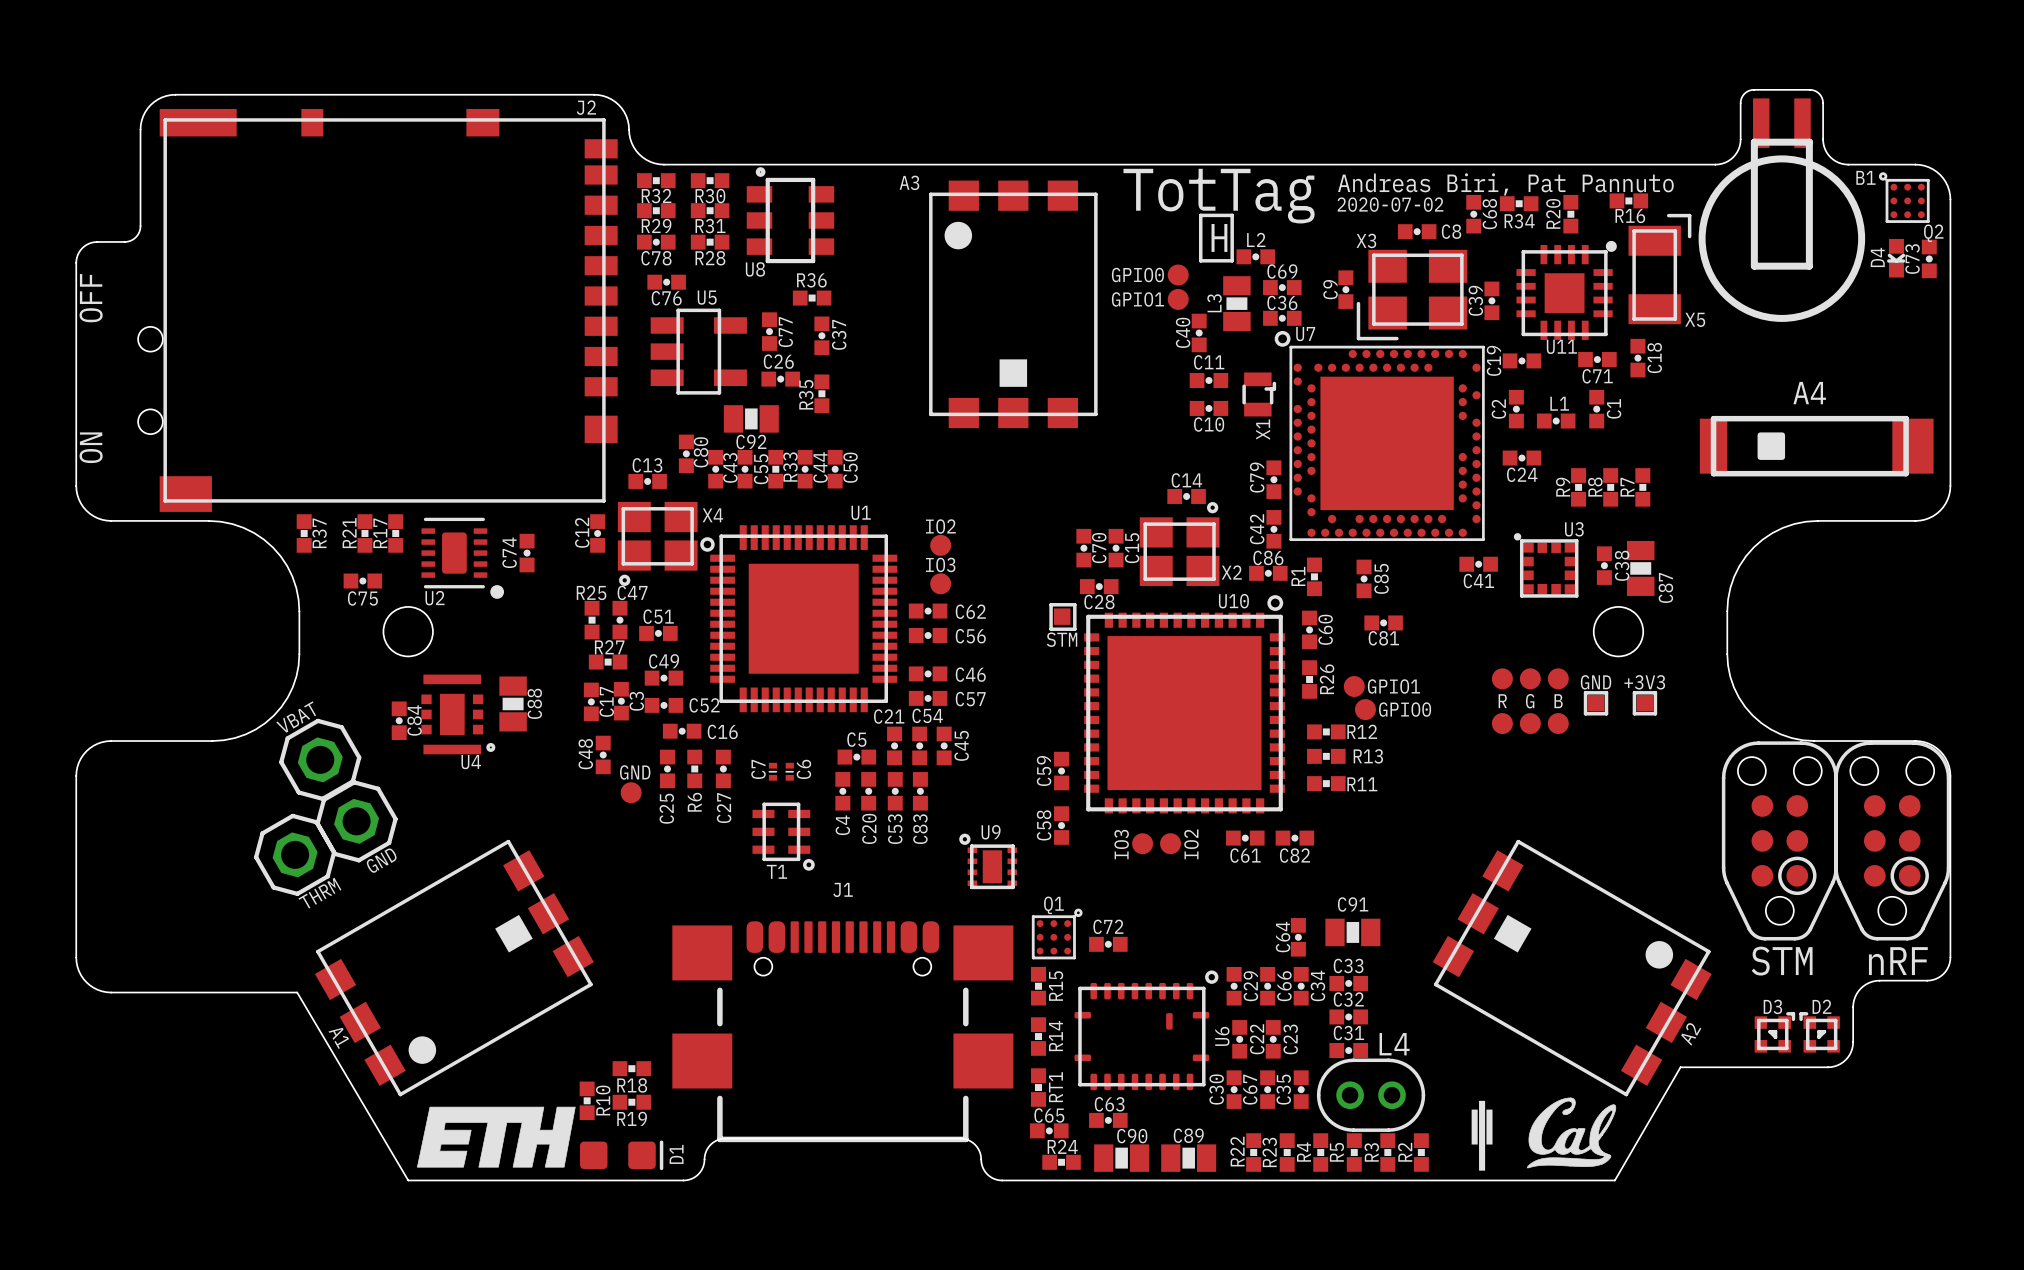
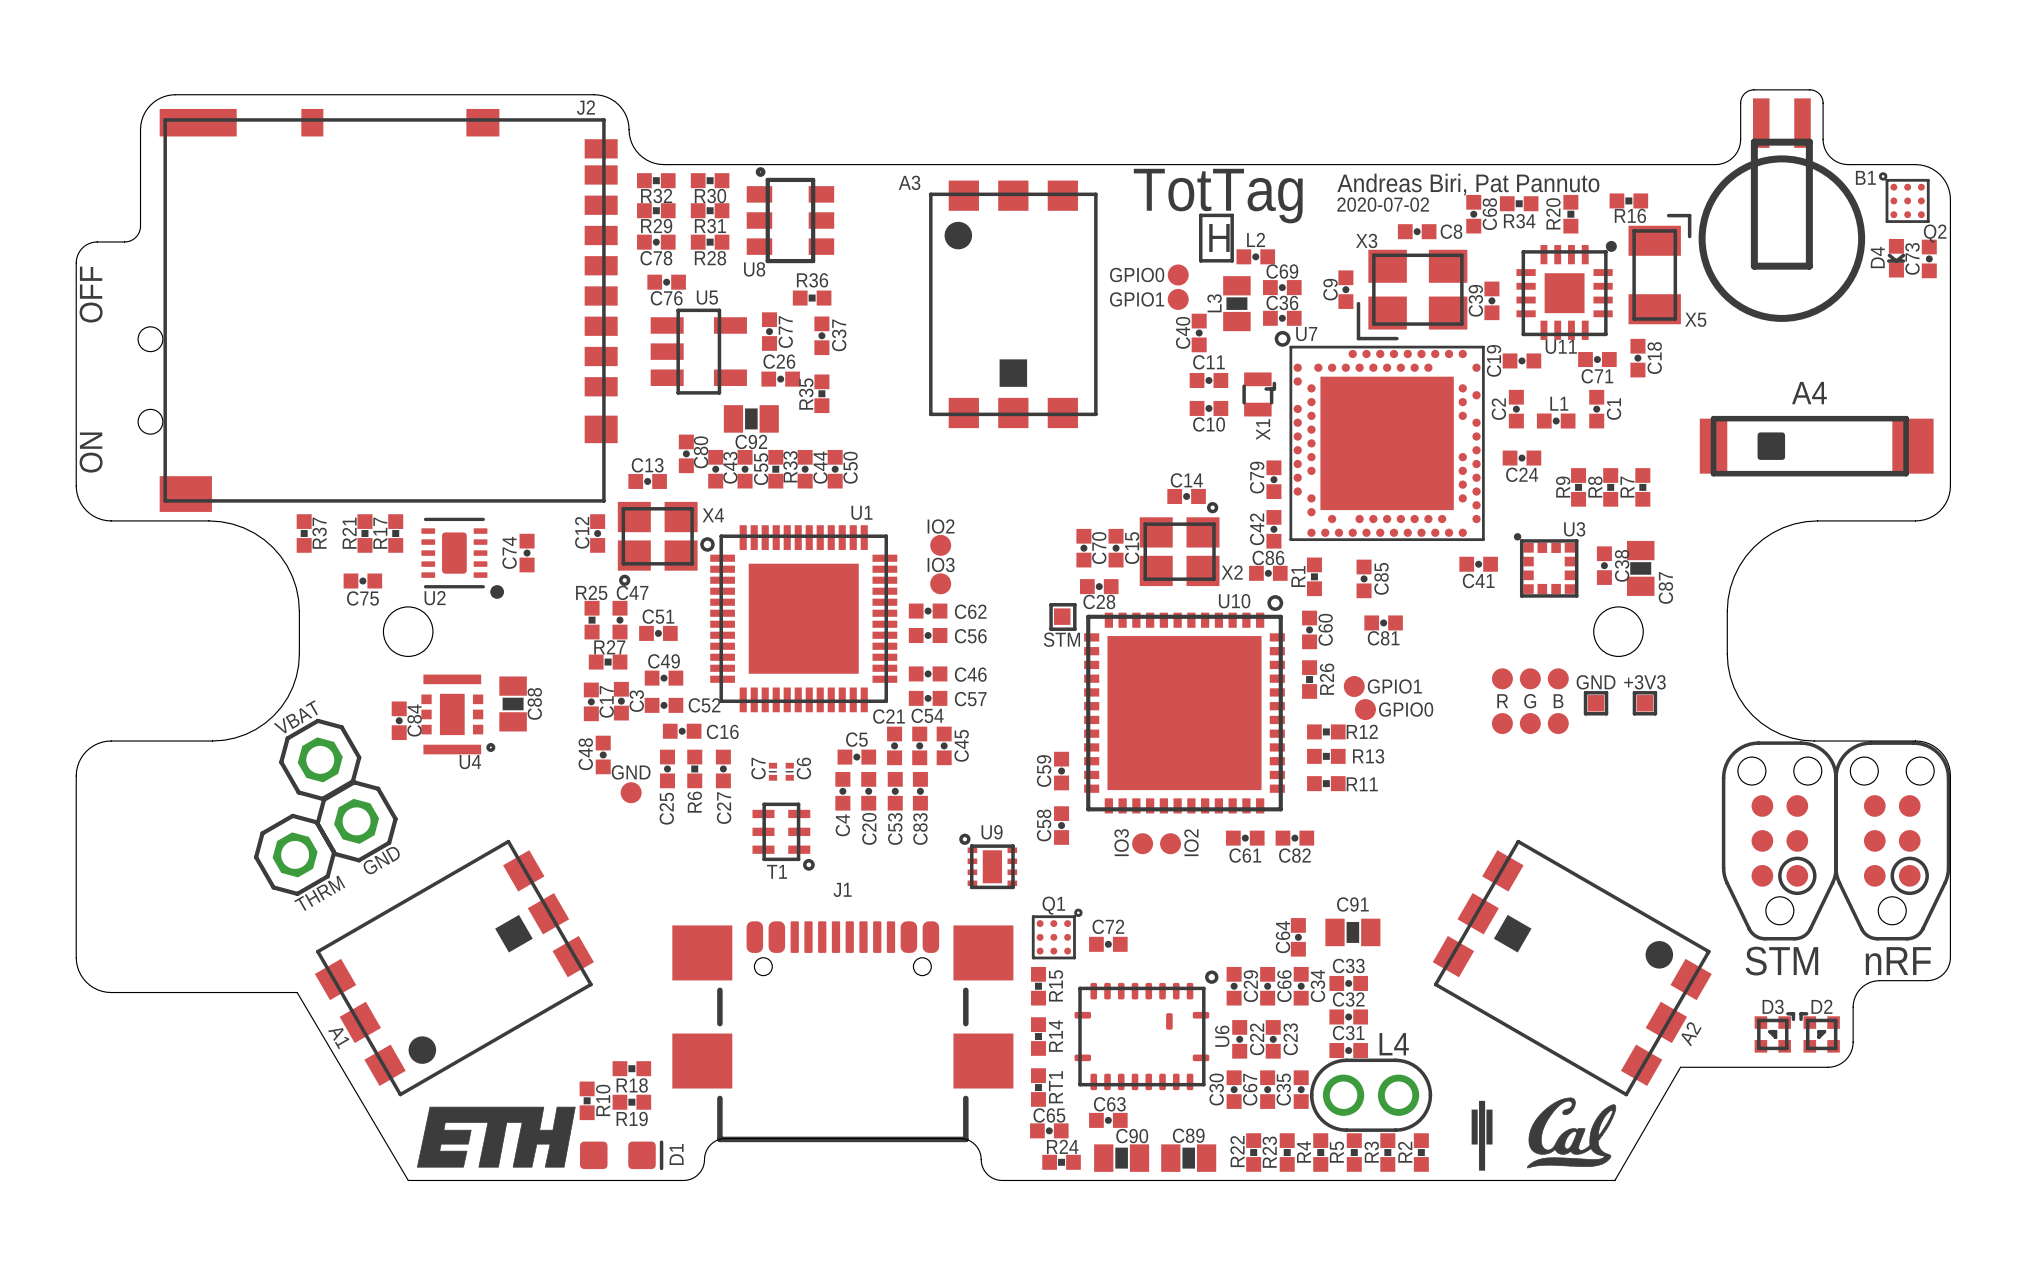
L4 footprint: [1316, 1058, 1426, 1132] -> [1309, 1058, 1433, 1132]

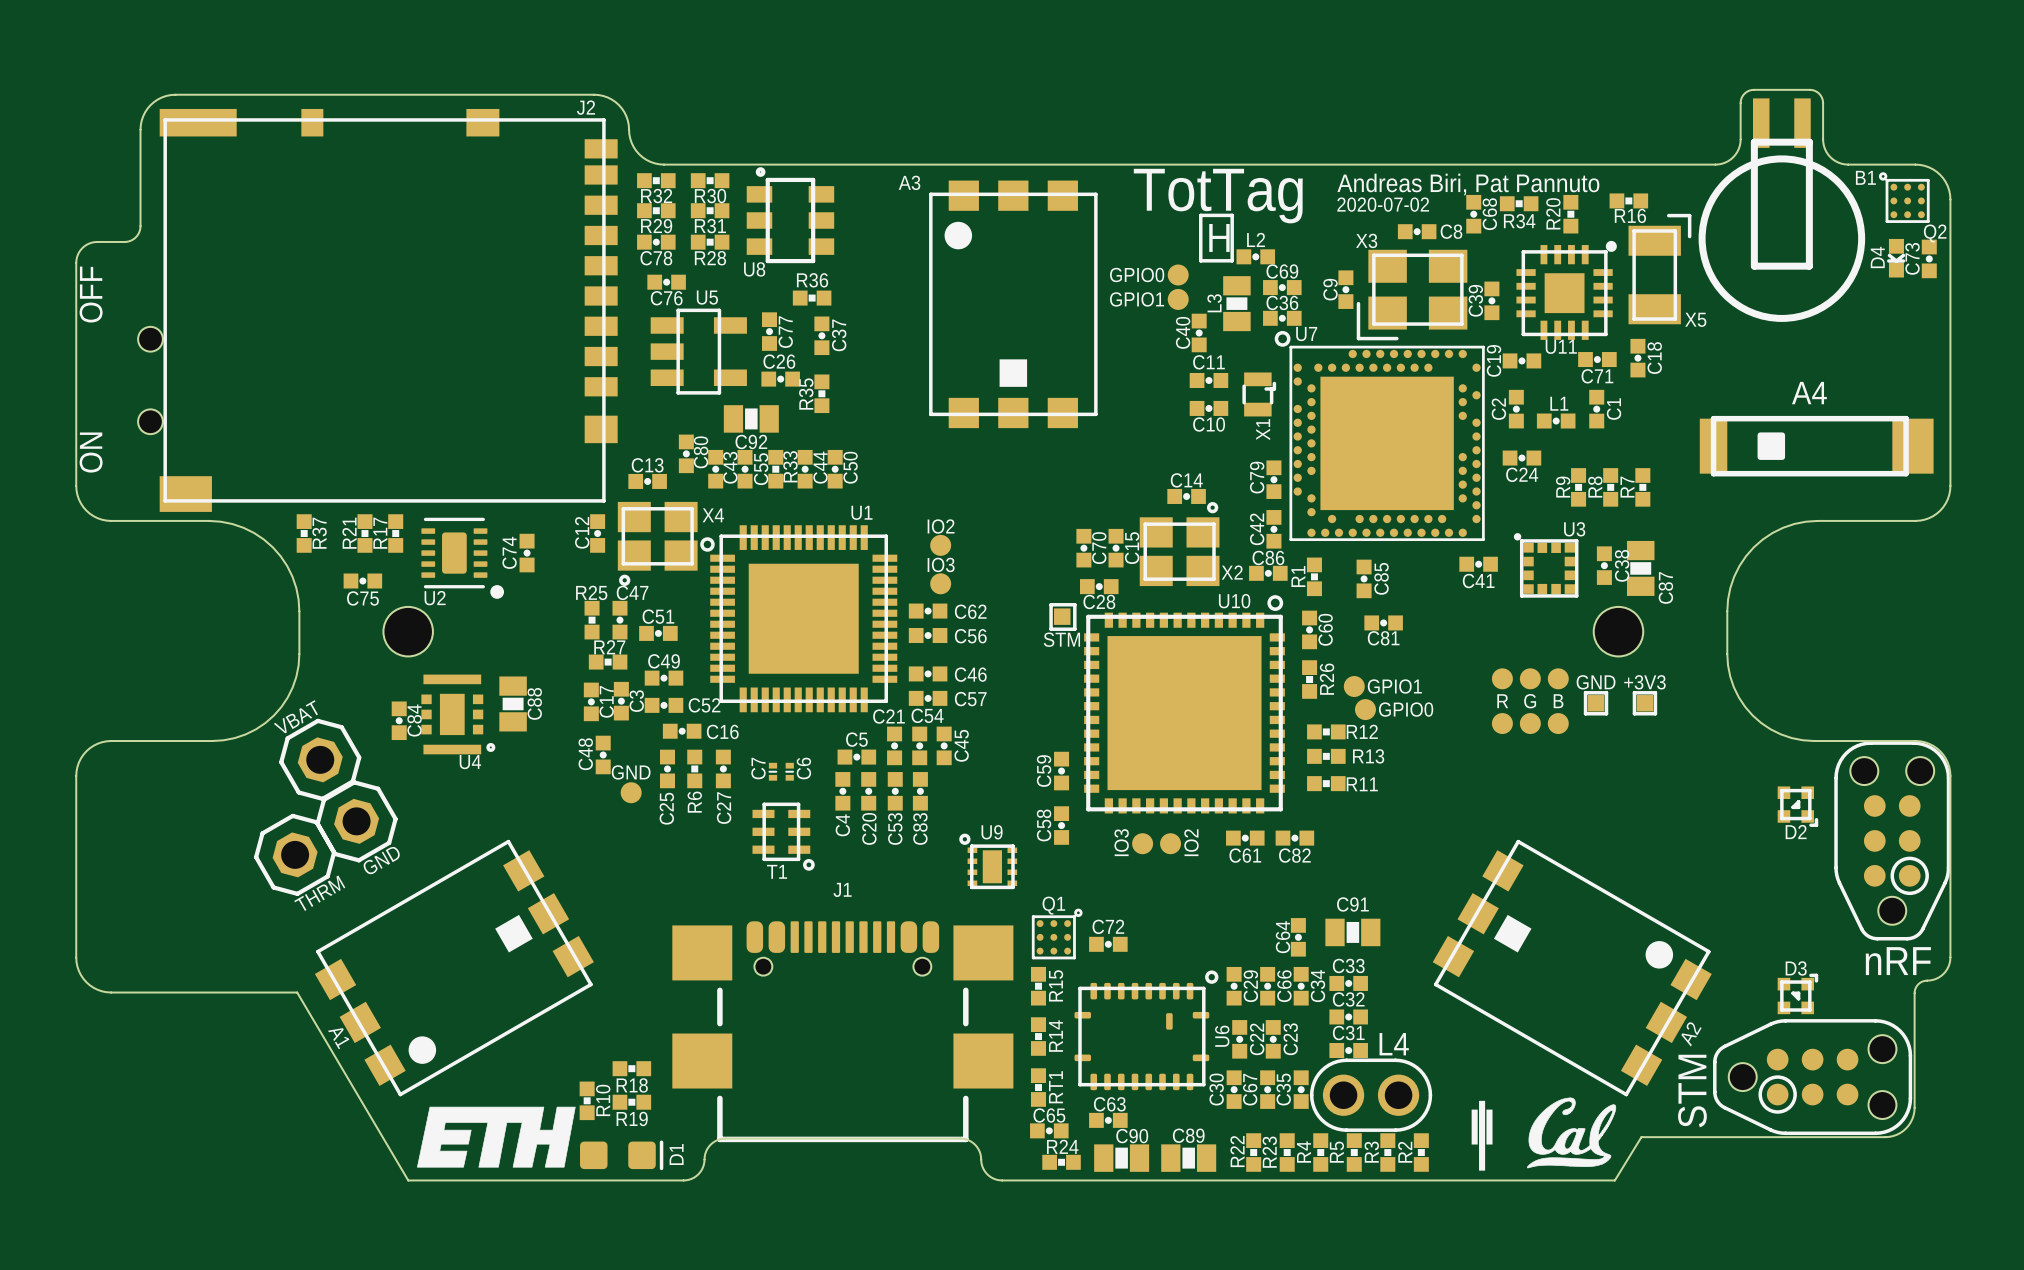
part rotation: 0° (1779, 840) -> 90° clockwise (1812, 1077)
part position: (1779, 840) -> (1812, 1077)
text rotation: 0° (1781, 961) -> 90° counterclockwise (1692, 1091)
text position: STM (1781, 961) -> STM (1692, 1091)
board edge: (1927, 980) (1876, 980) (1860, 988) (1853, 1003) (1852, 1048) (1845, 1059) (1837, 1065) (1827, 1067) (1680, 1067) (1614, 1180) -> (1927, 980) (1918, 984) (1914, 991) (1914, 1111) (1910, 1122) (1899, 1133) (1885, 1137) (1641, 1137) (1614, 1180)
D3 position: (1774, 1032) -> (1797, 993)
D2 rotation: 0° (1819, 1032) -> 180° (1797, 806)
D2 position: (1819, 1032) -> (1797, 806)

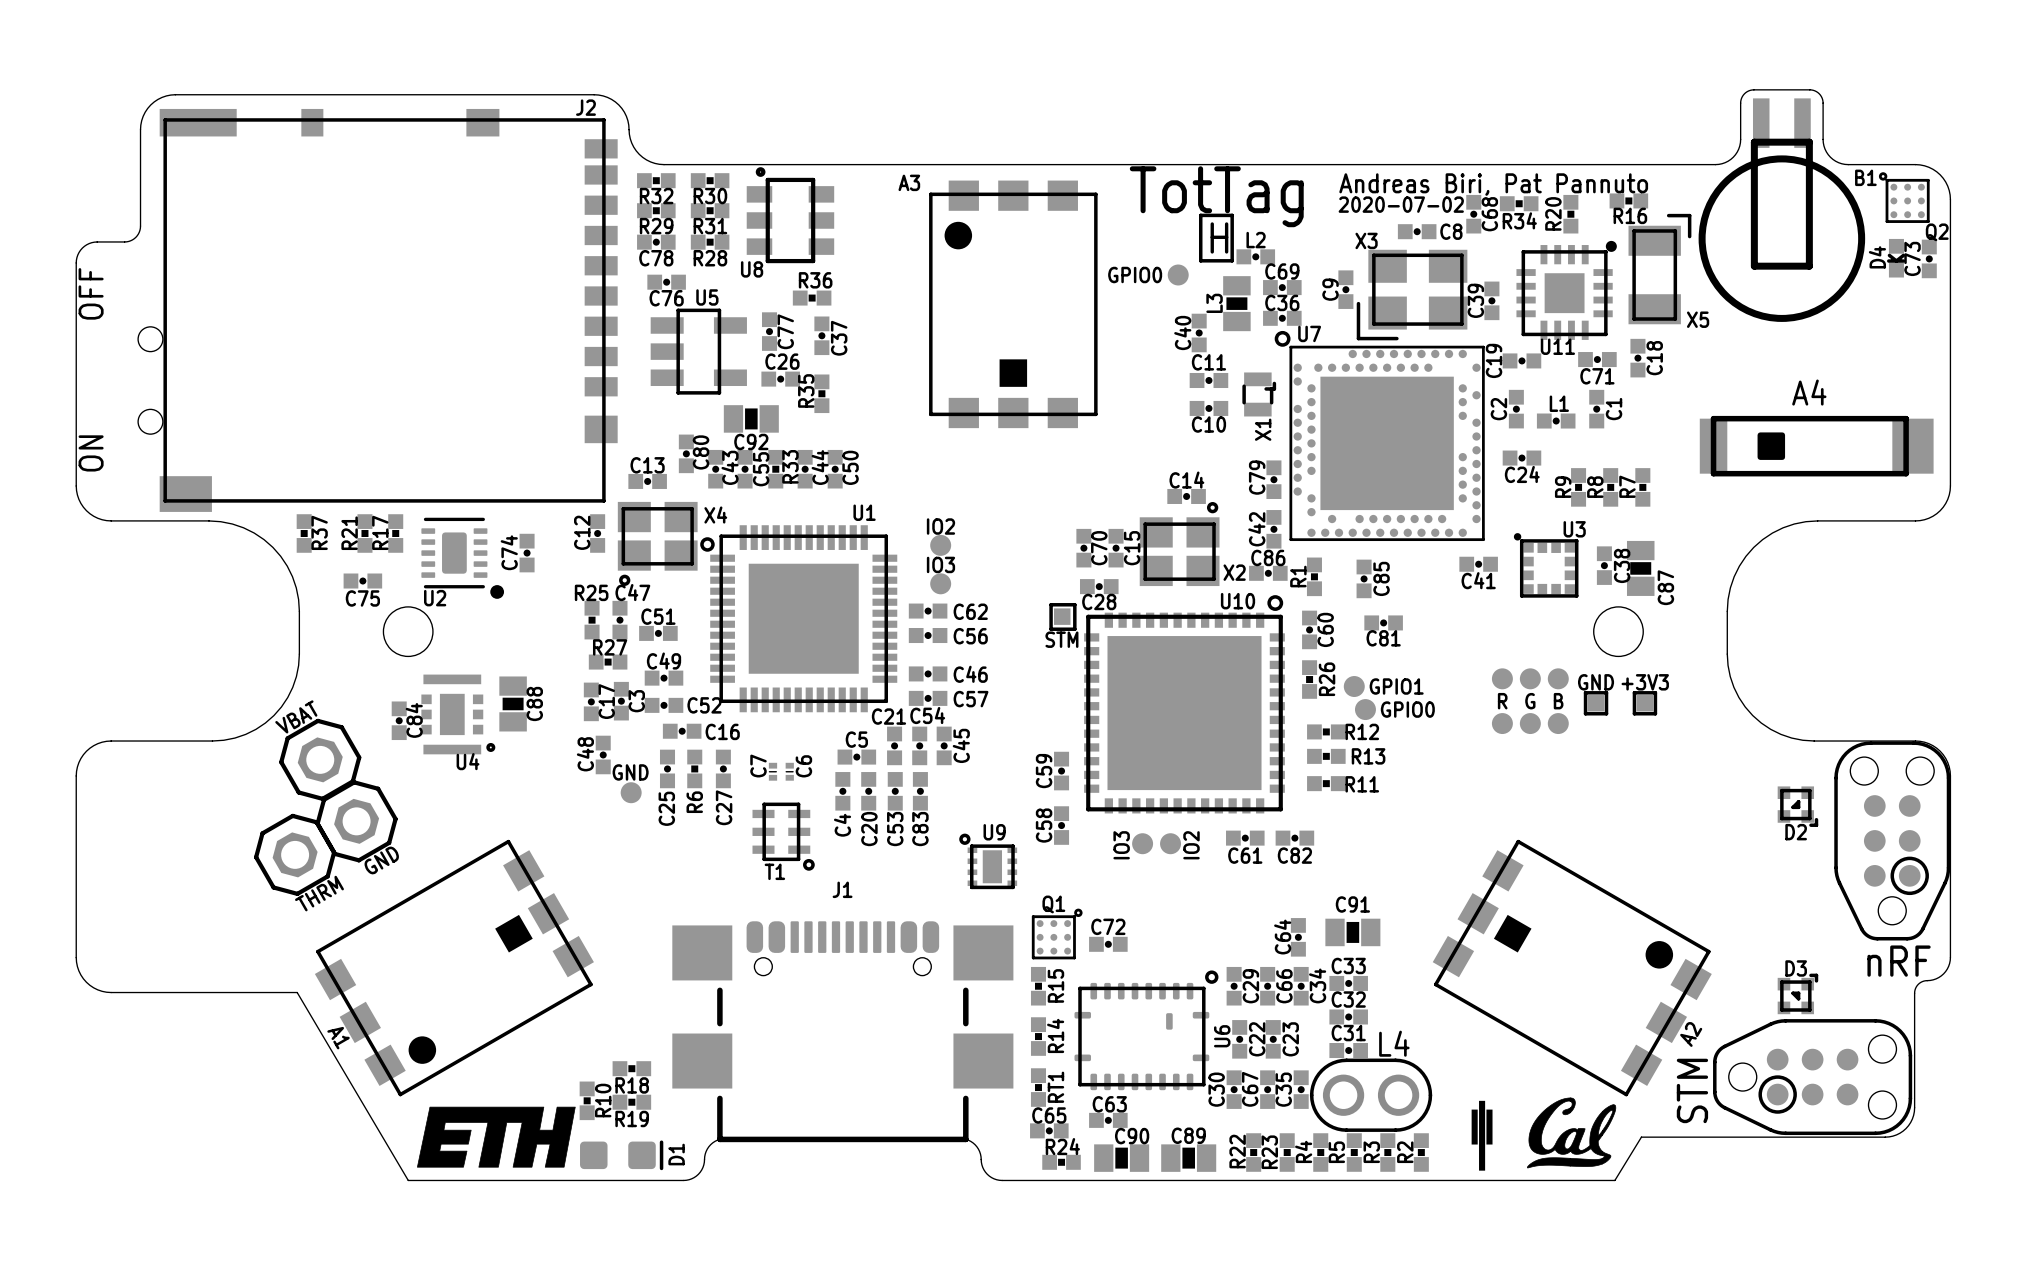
text: GPIO1 (1137, 299) -> none
part: (1178, 299) -> none

